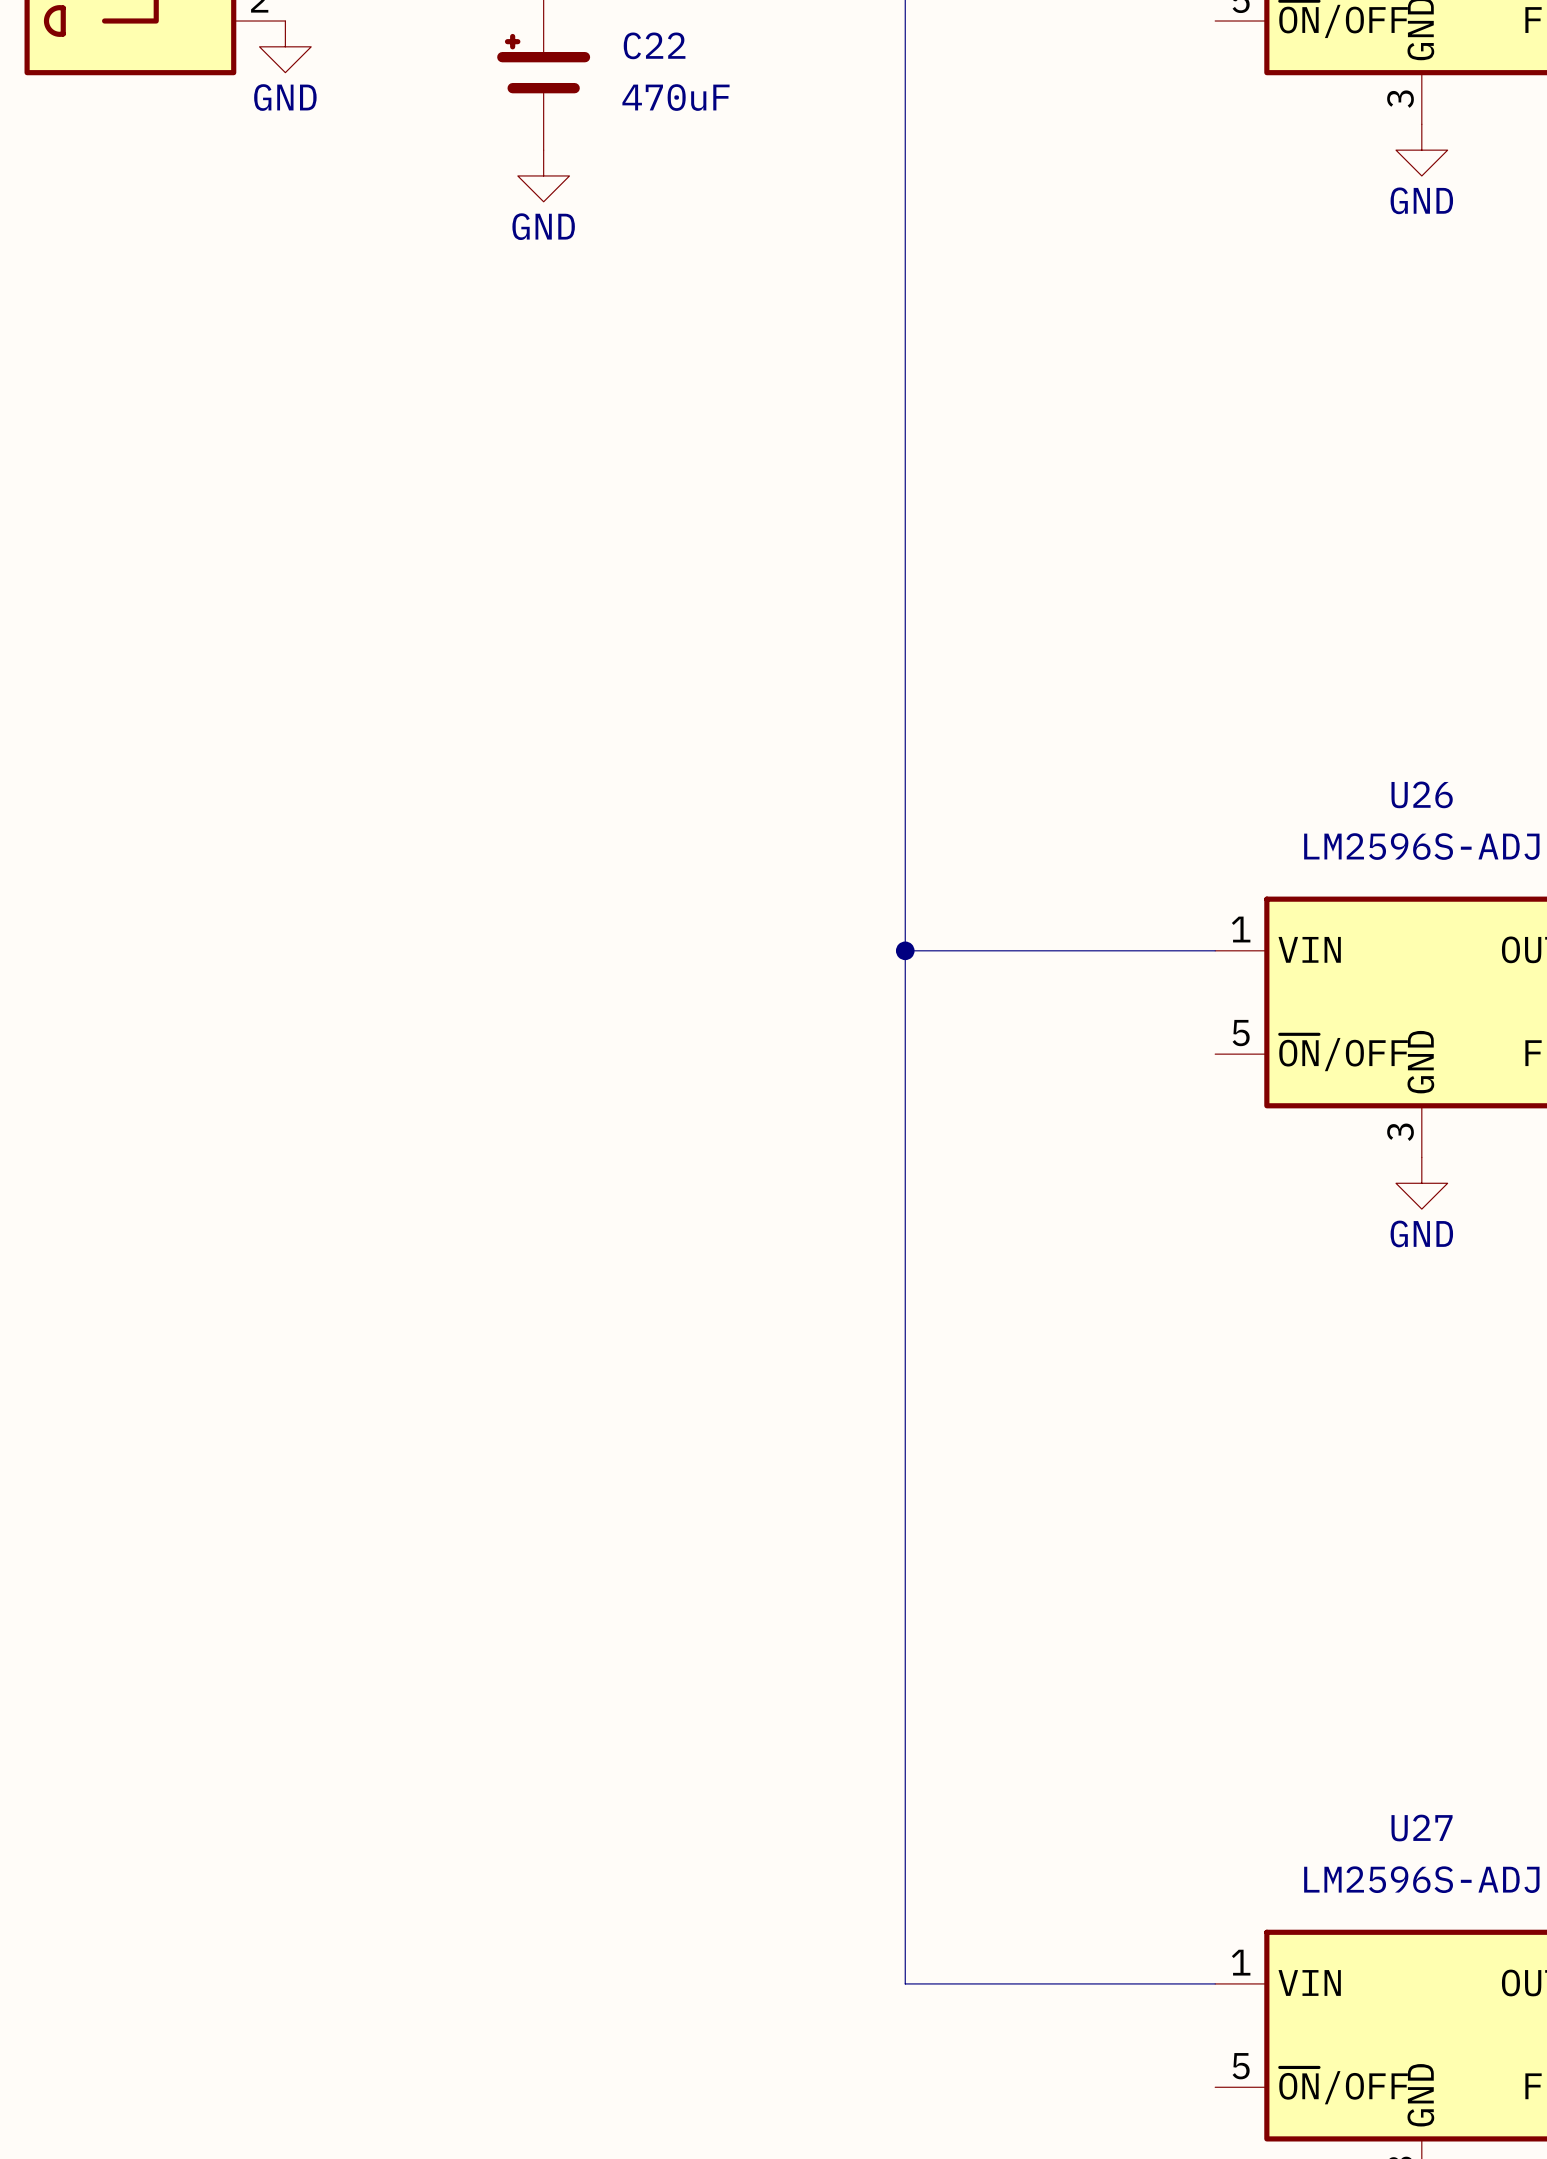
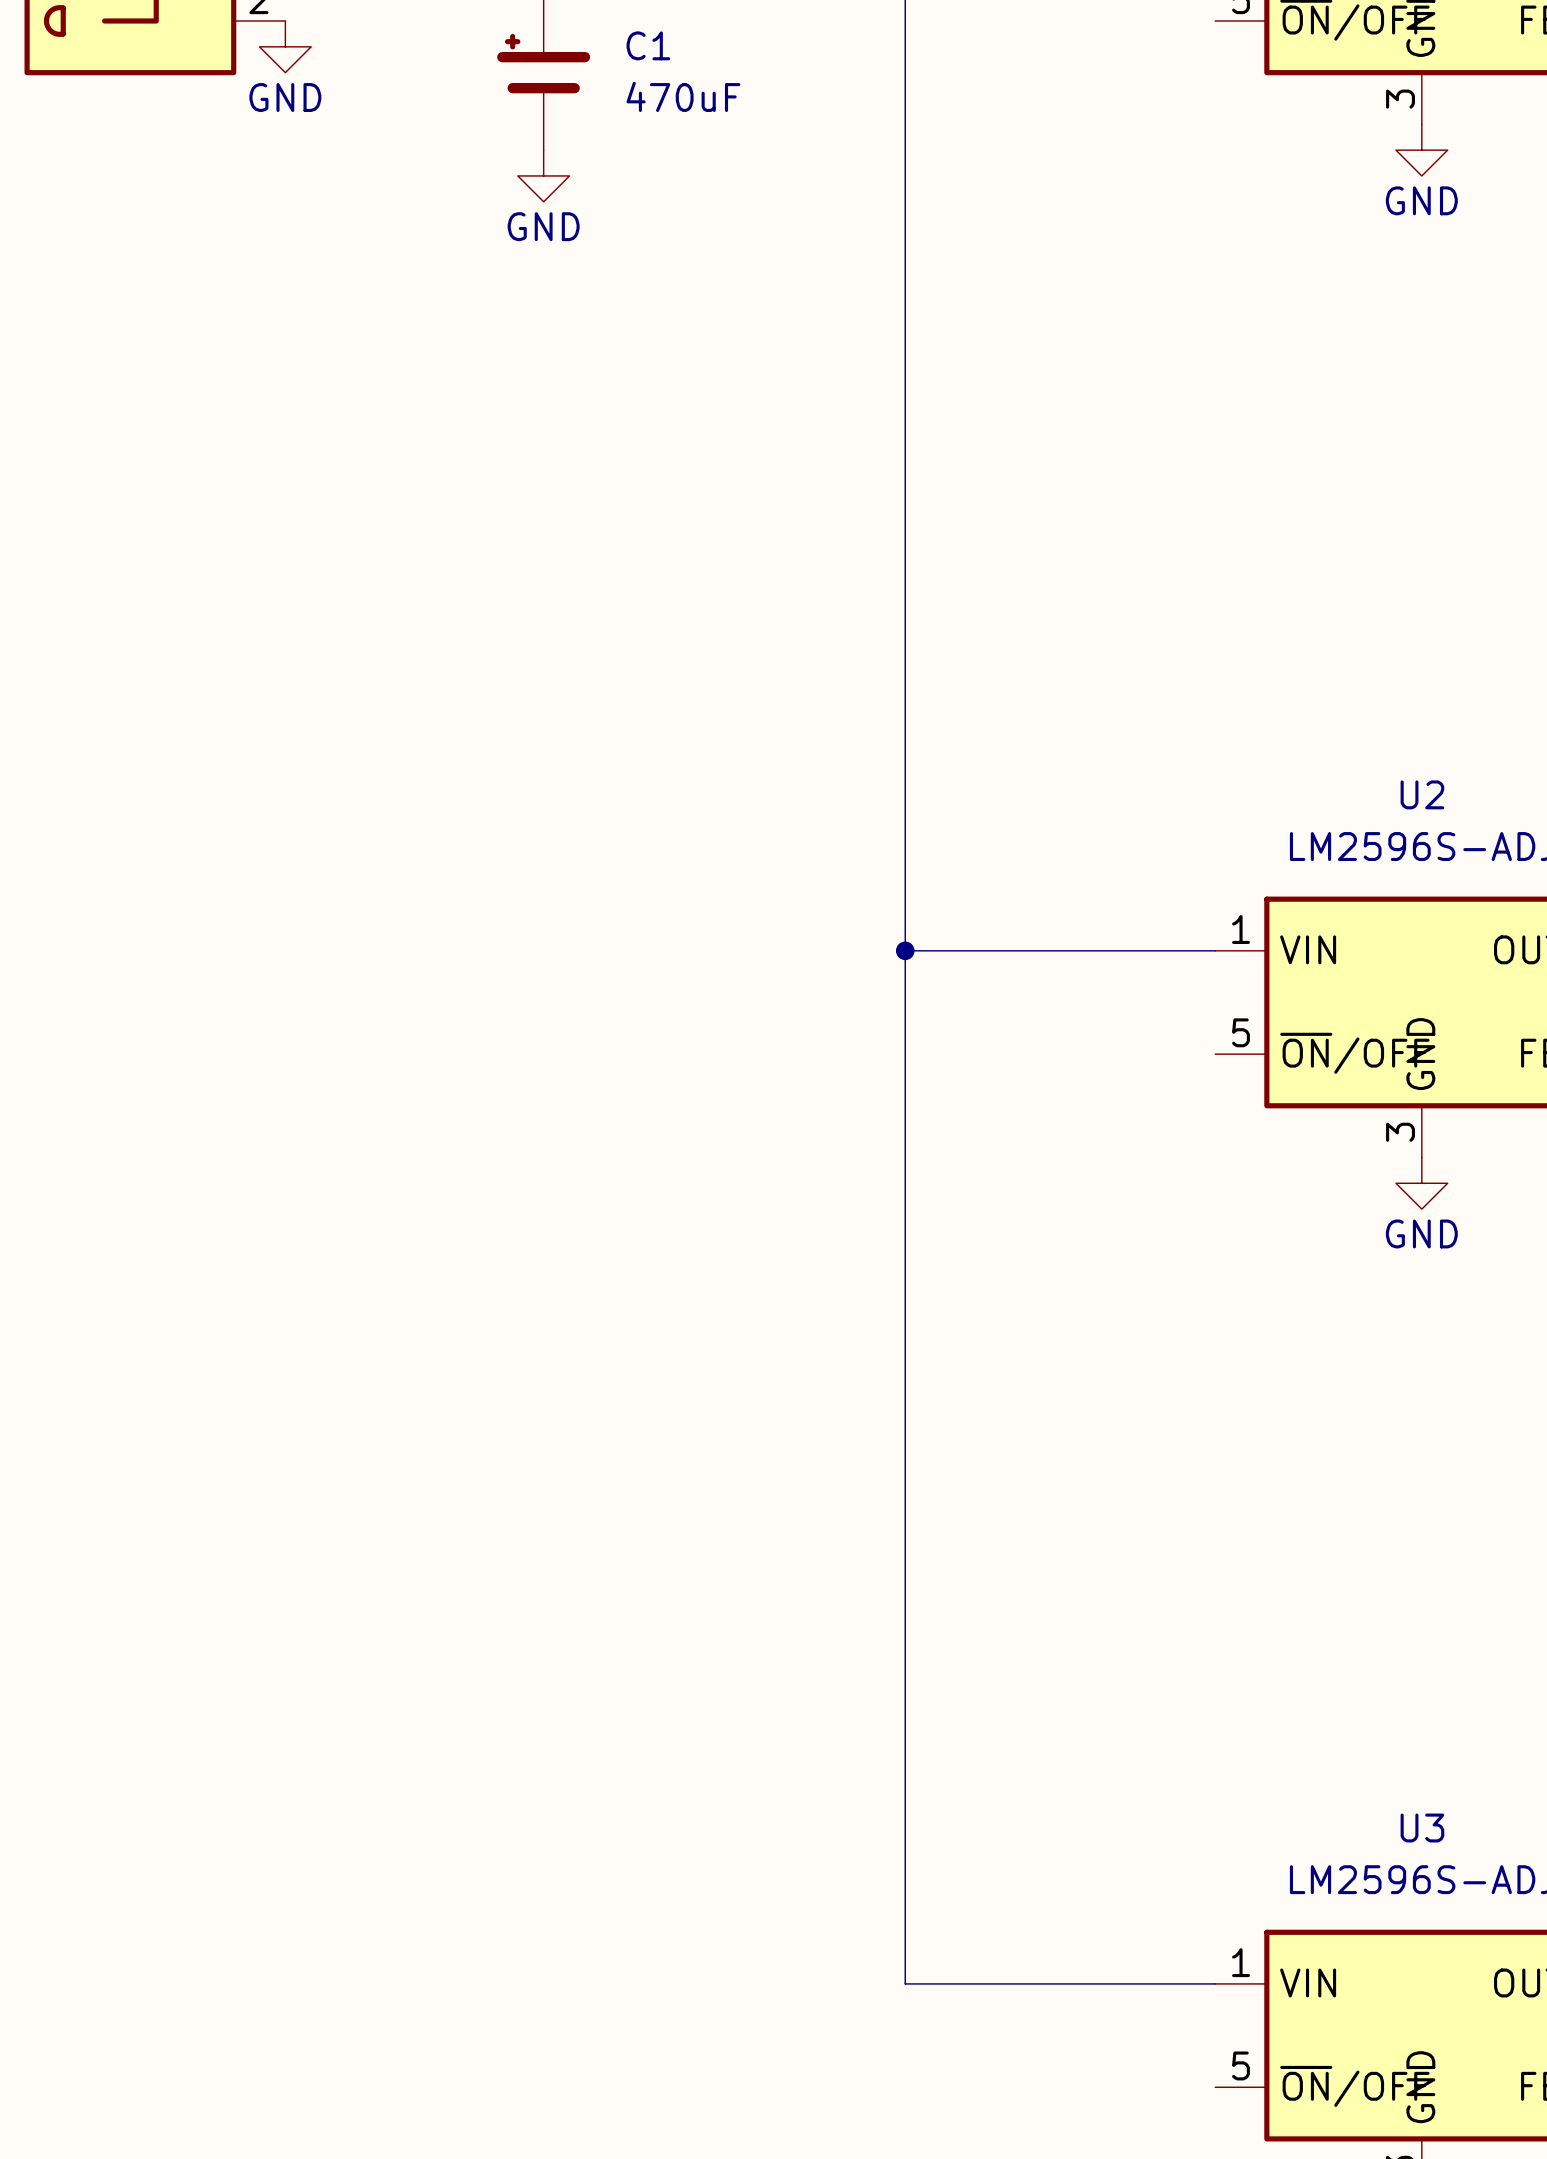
C22 name: C22 (654, 45) -> C1 (648, 45)
U26 name: U26 (1422, 794) -> U2 (1422, 794)
U27 name: U27 (1422, 1828) -> U3 (1422, 1828)

